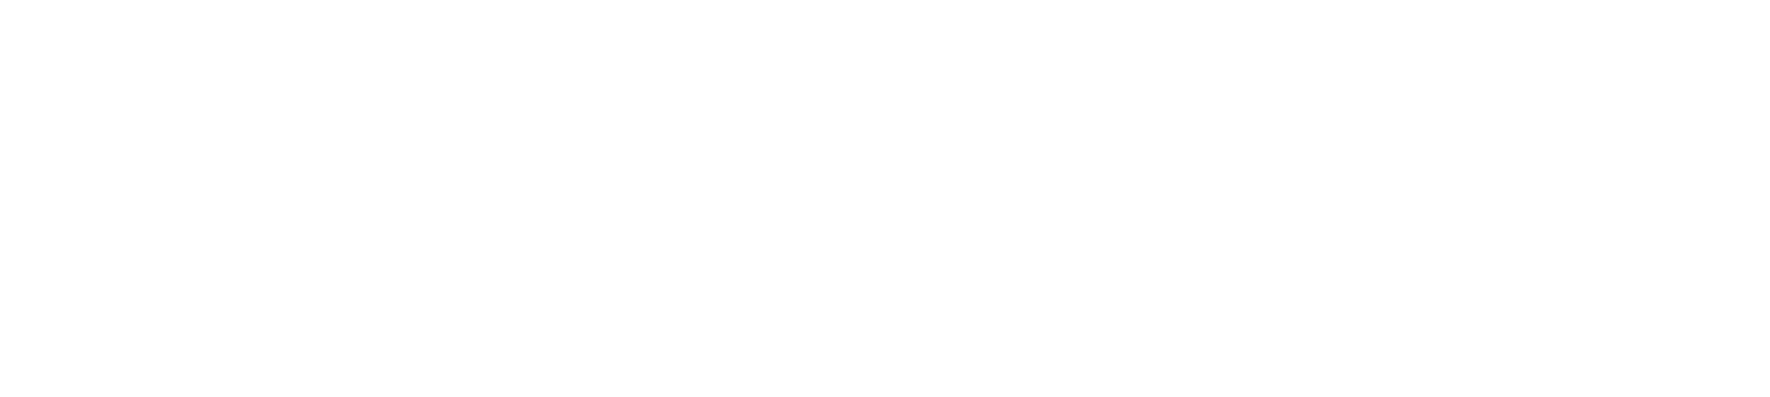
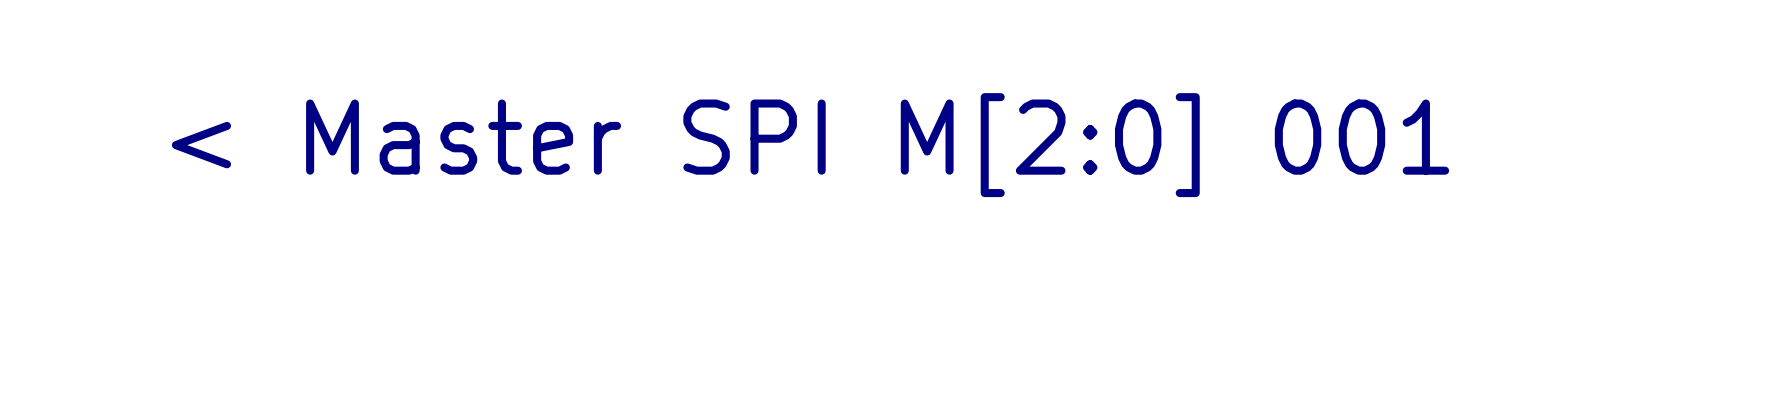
text: none -> < Master SPI M[2:0] 001 (810, 145)

